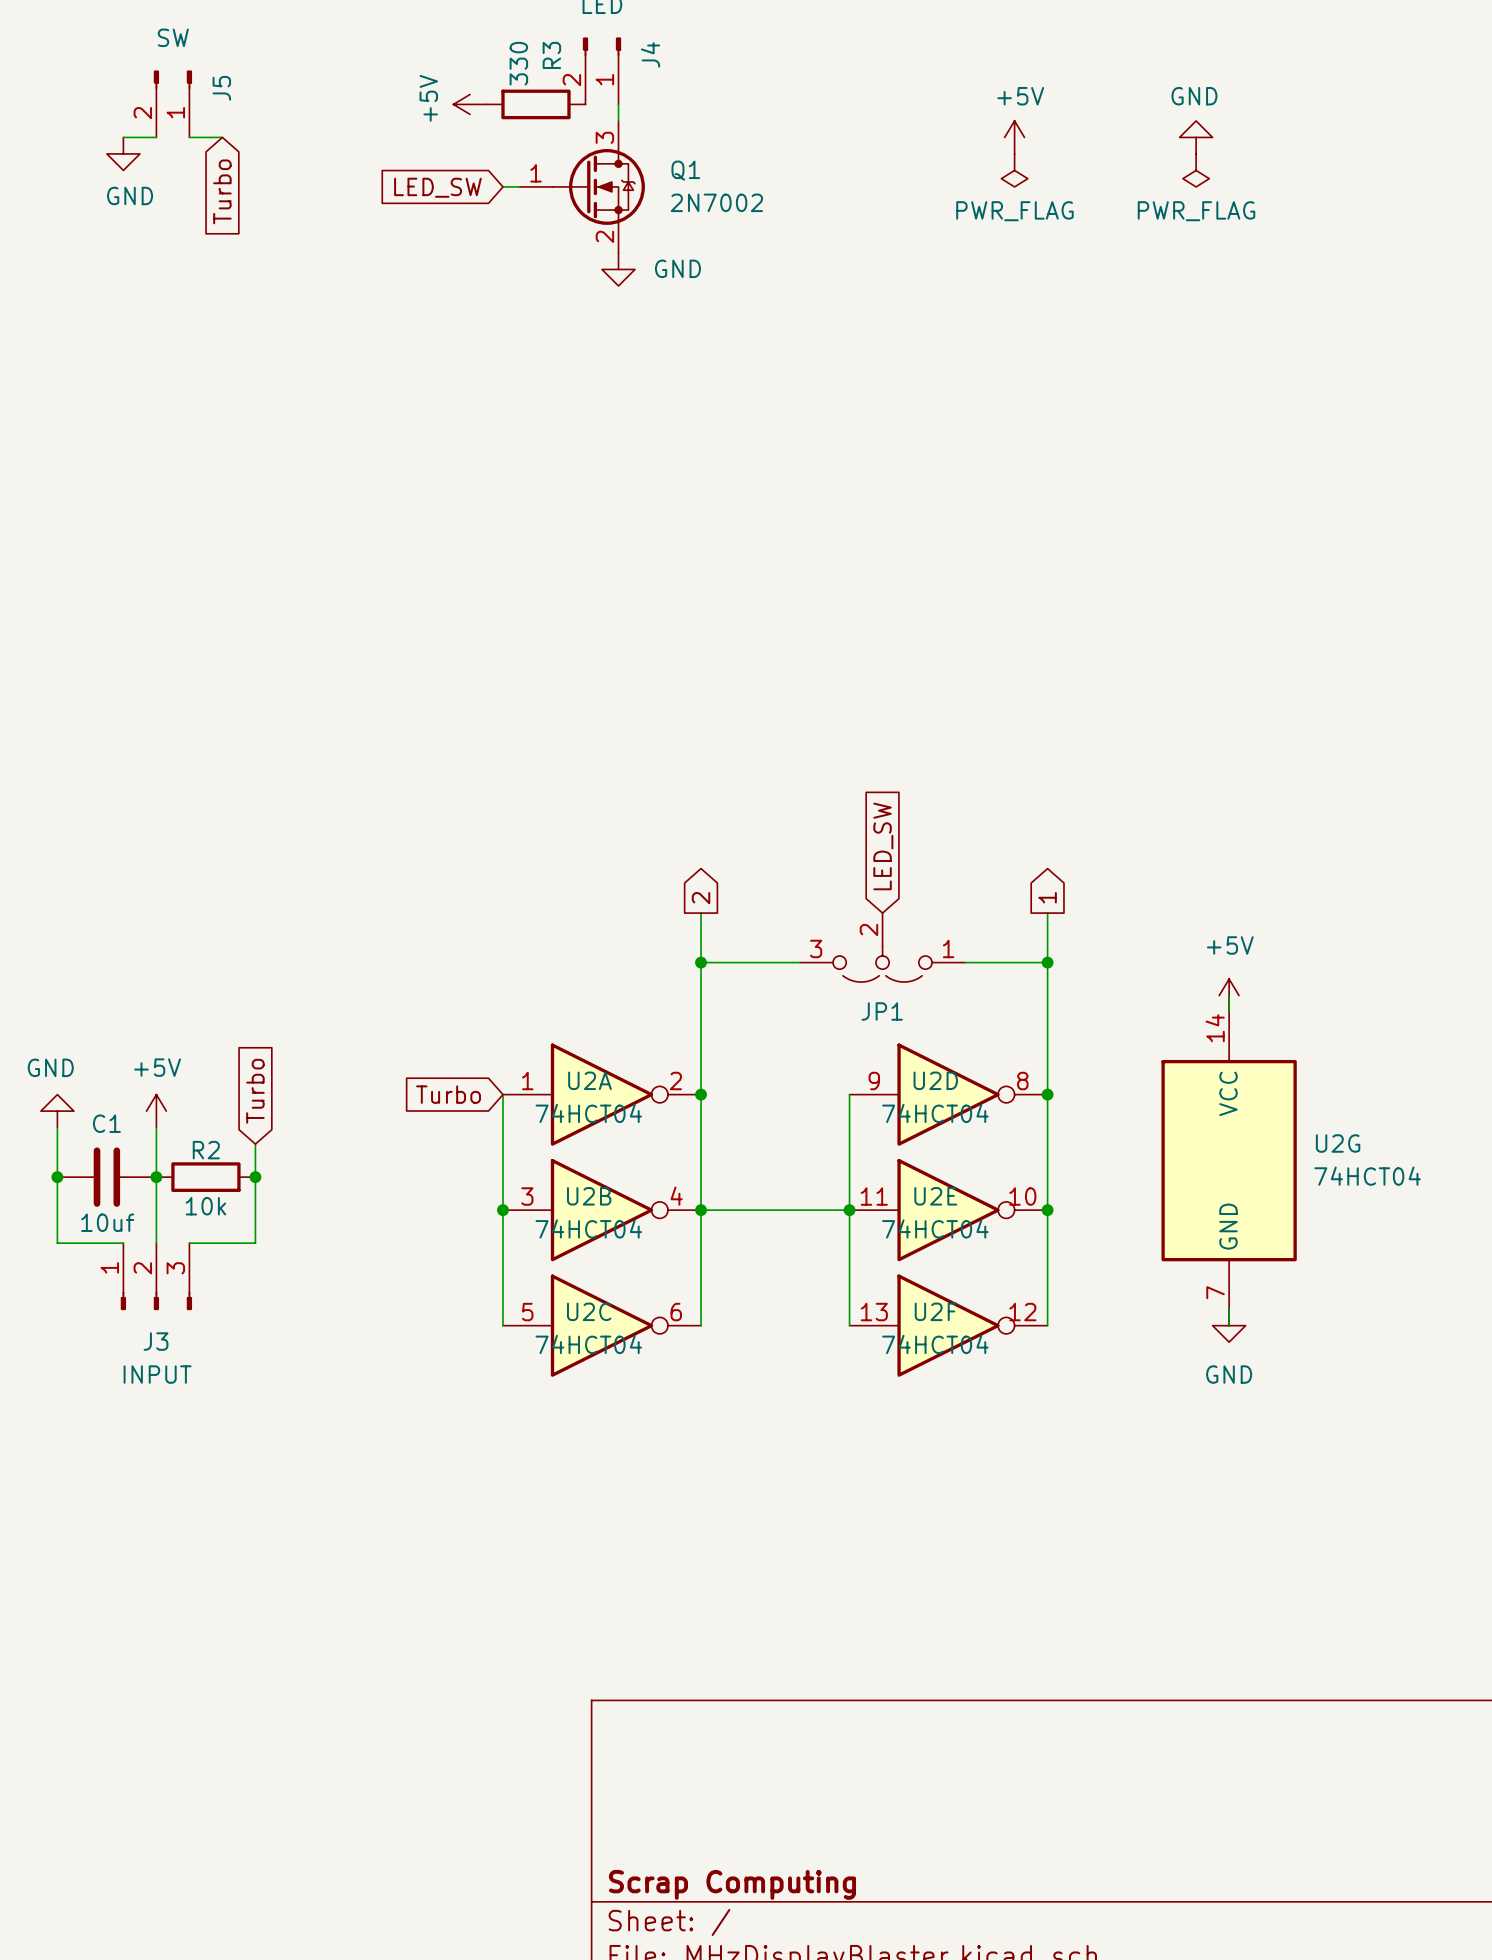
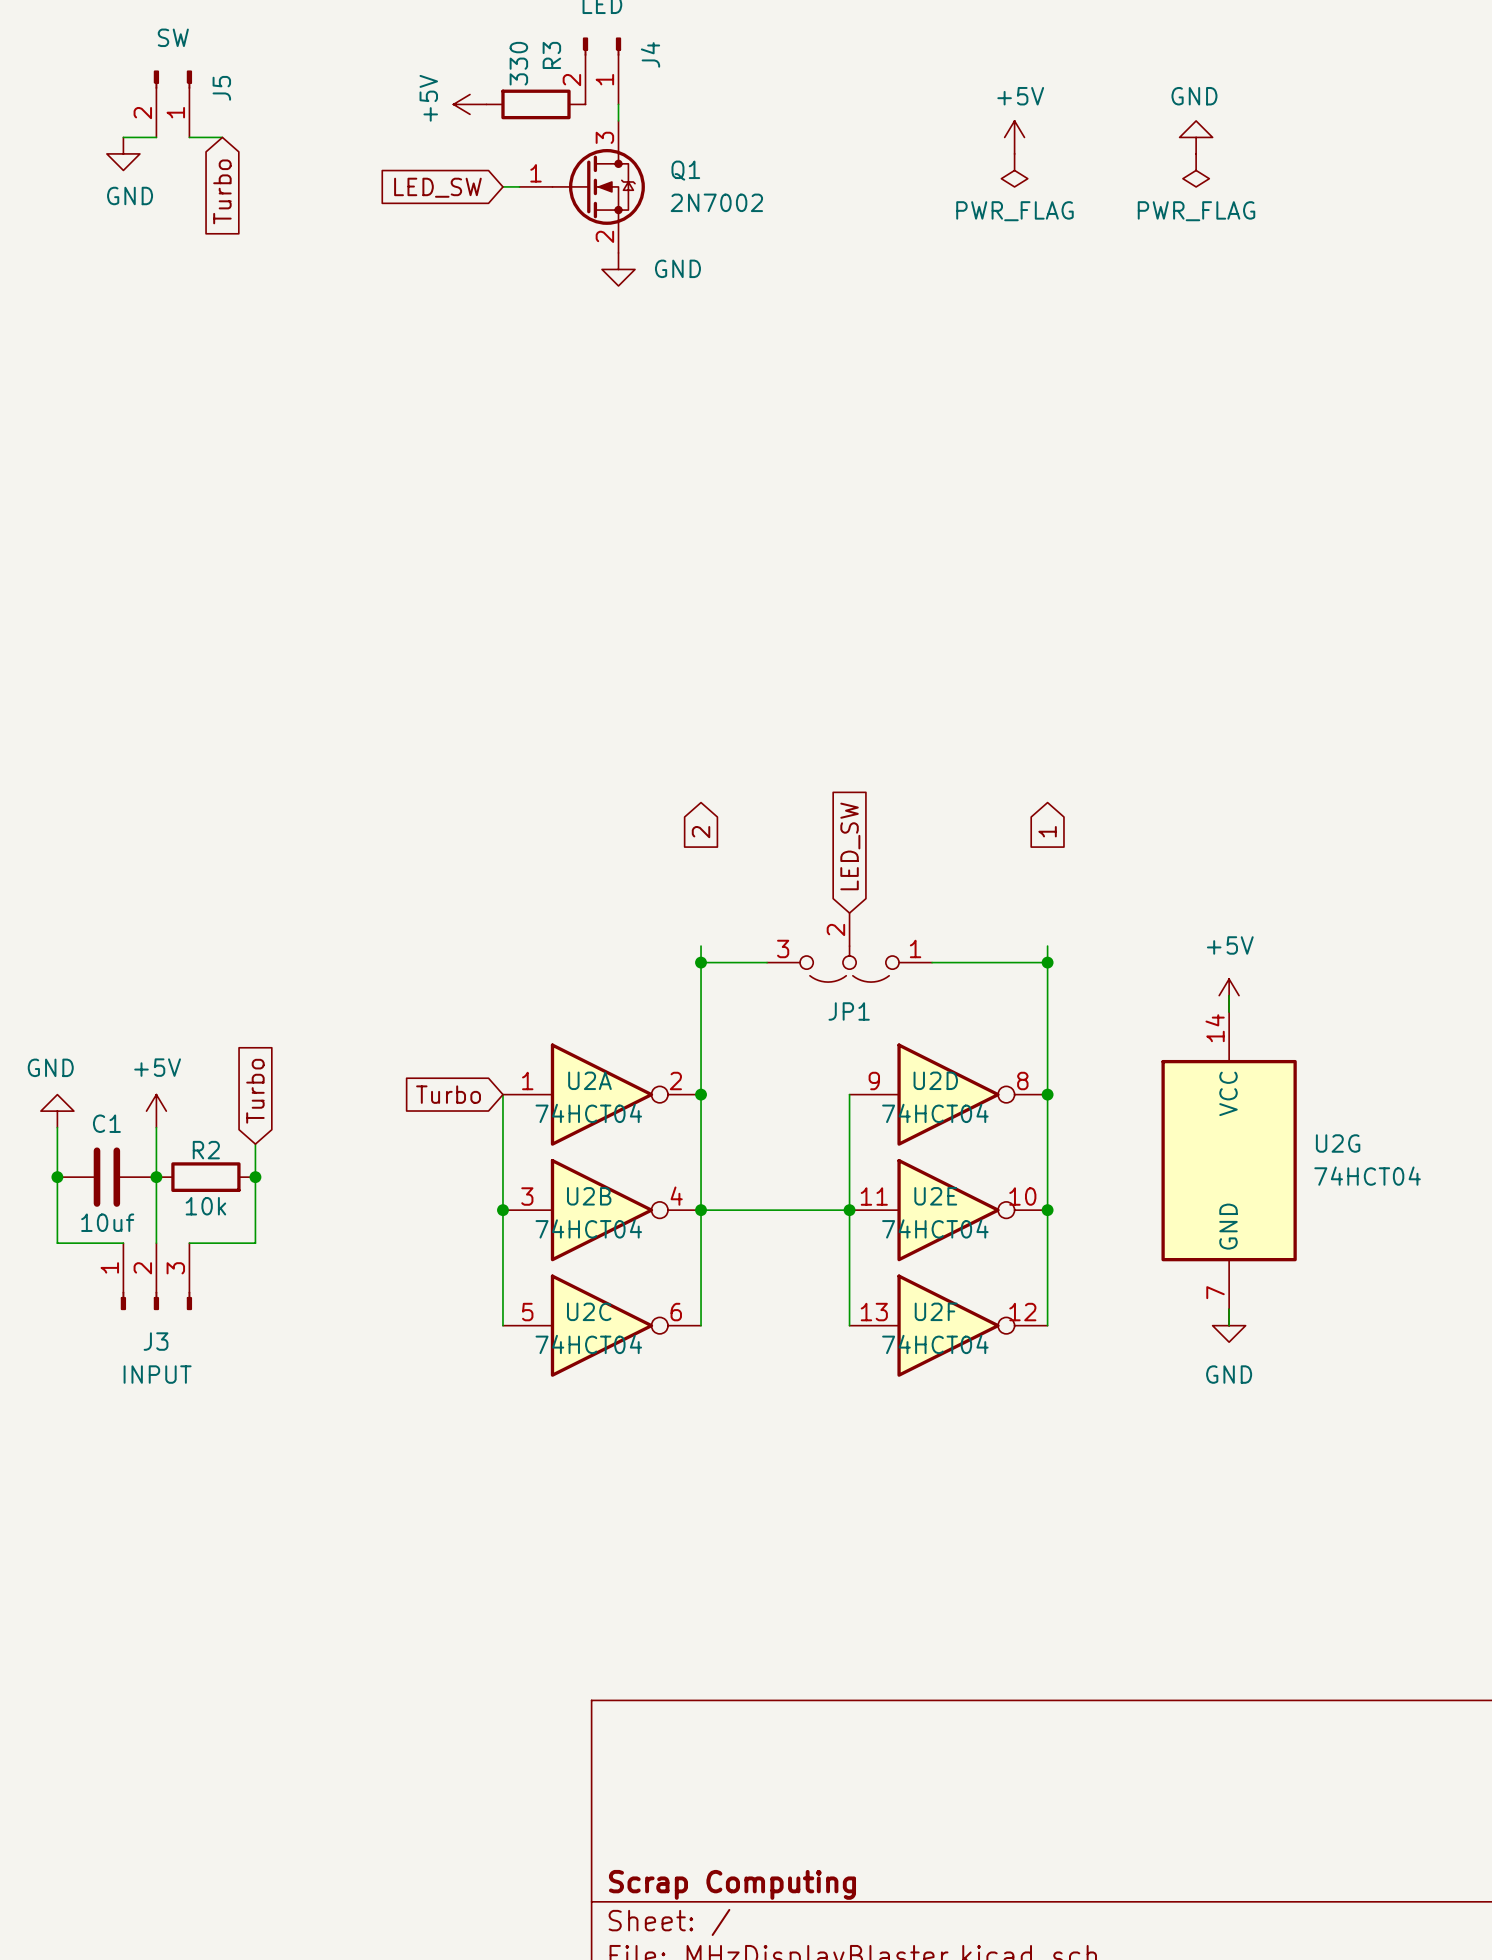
global label position: LED_SW (883, 846) -> LED_SW (850, 846)
global label position: 1 (1047, 897) -> 1 (1047, 831)
global label position: 2 (701, 898) -> 2 (701, 832)
wire: (701, 913) (701, 946) -> none
wire: (1047, 913) (1047, 946) -> none
JP1 position: (882, 947) -> (849, 947)

